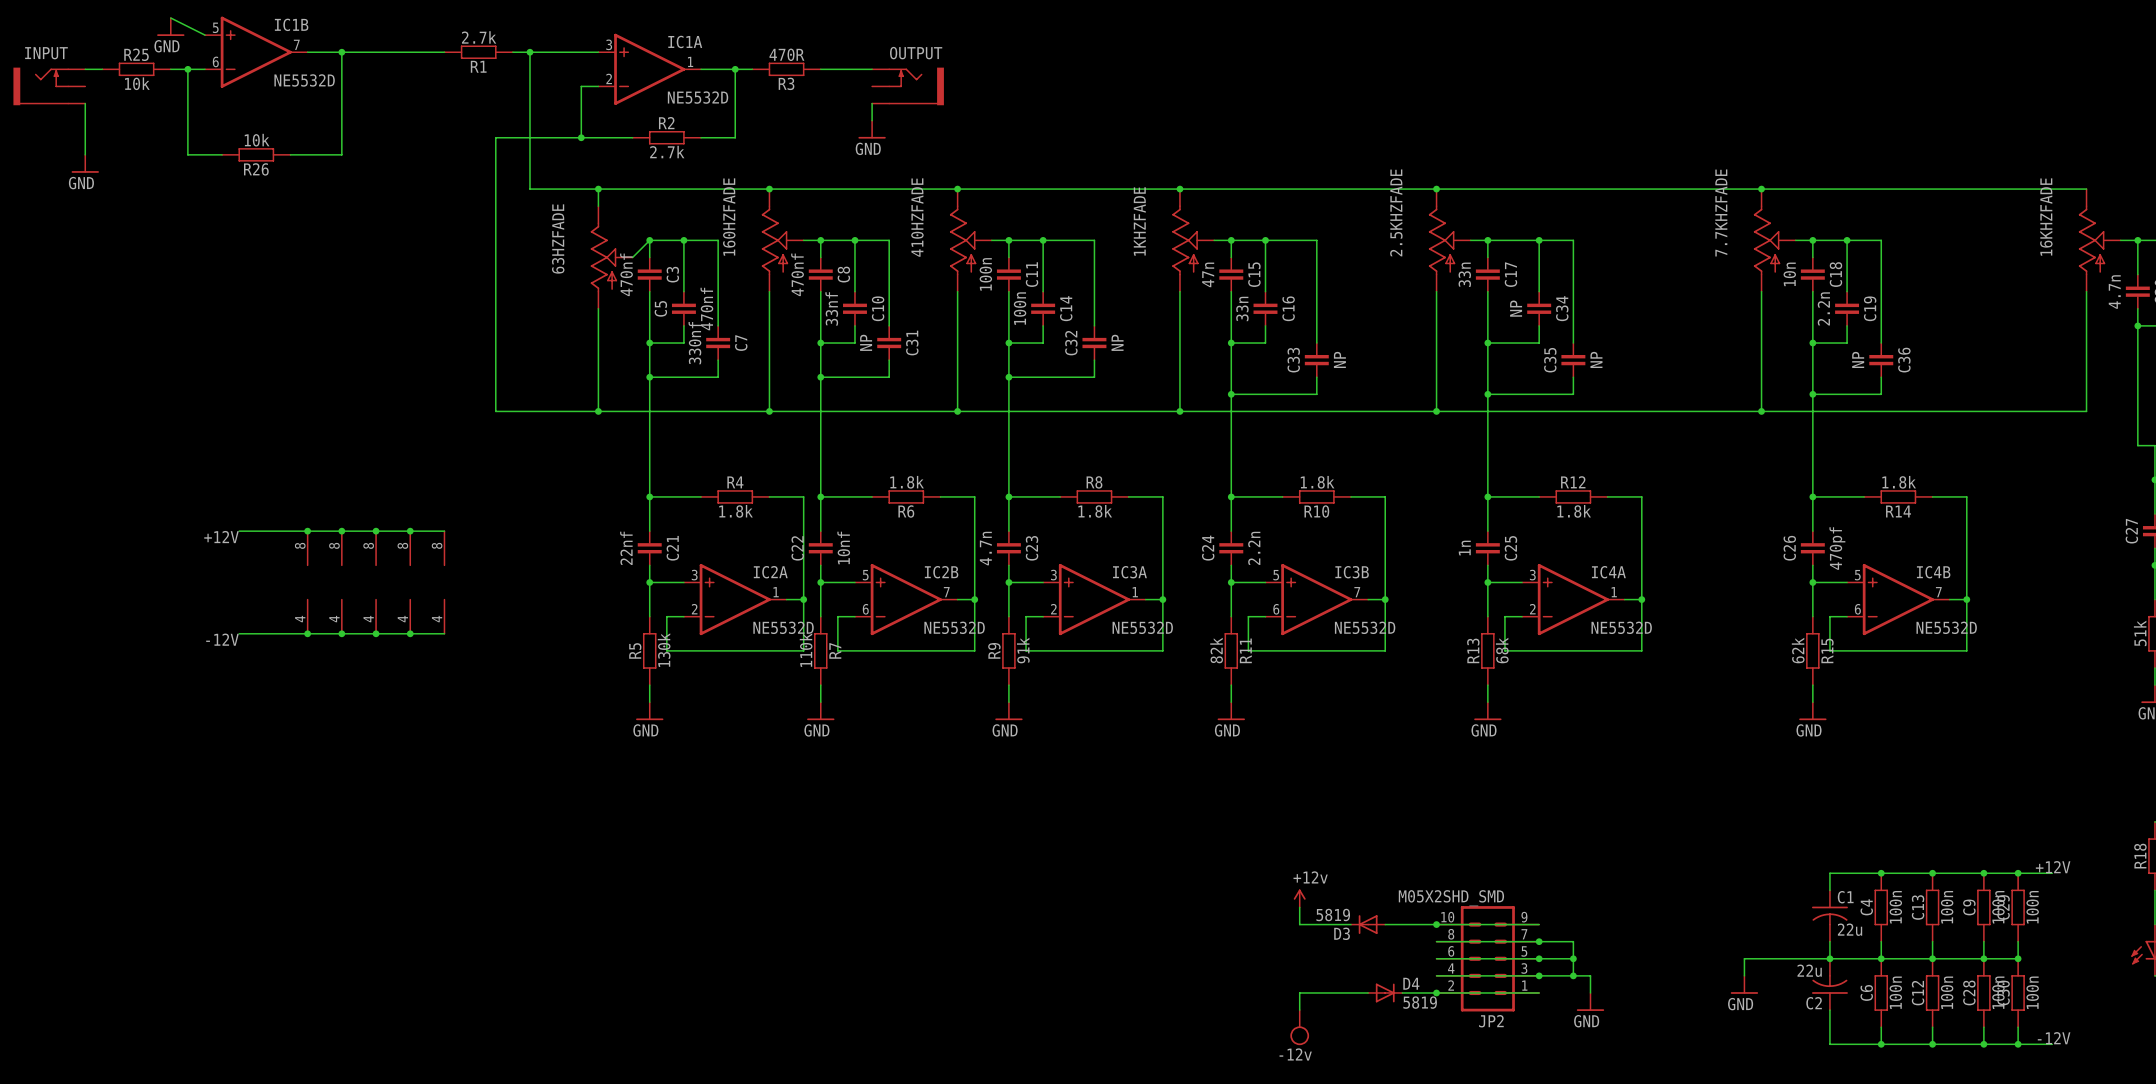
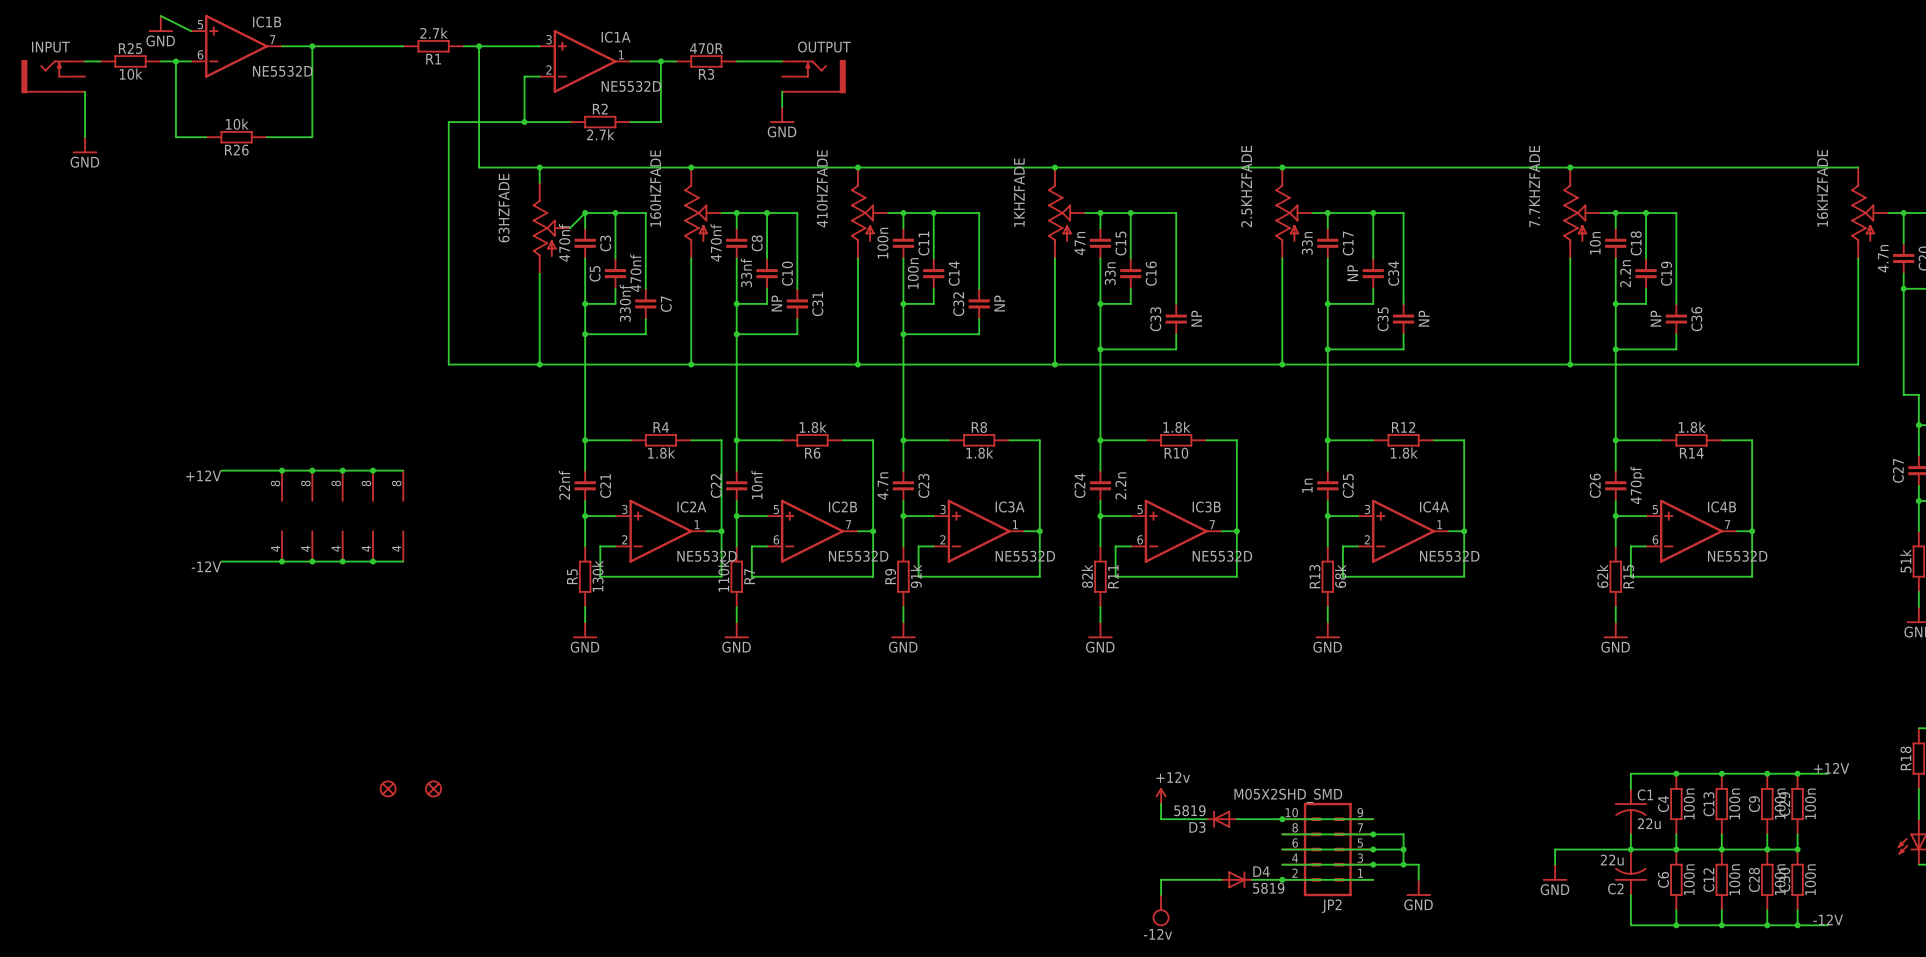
part: none -> (388, 788)
part: none -> (433, 788)

